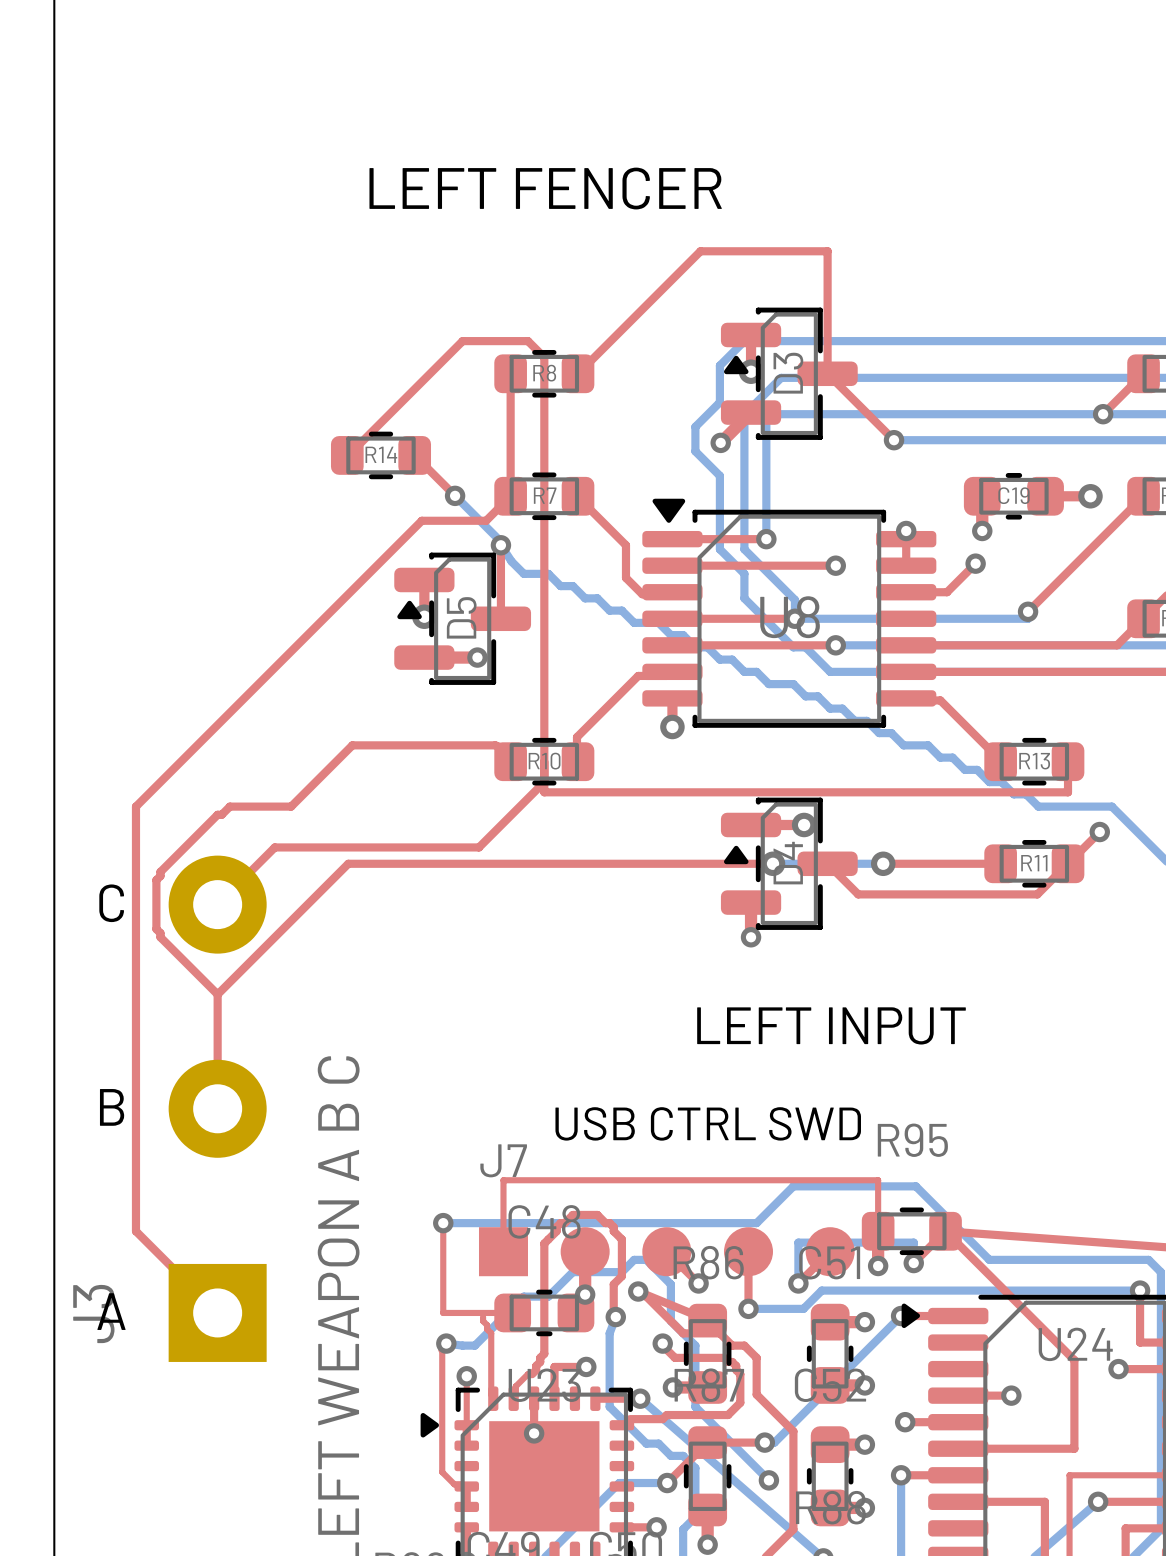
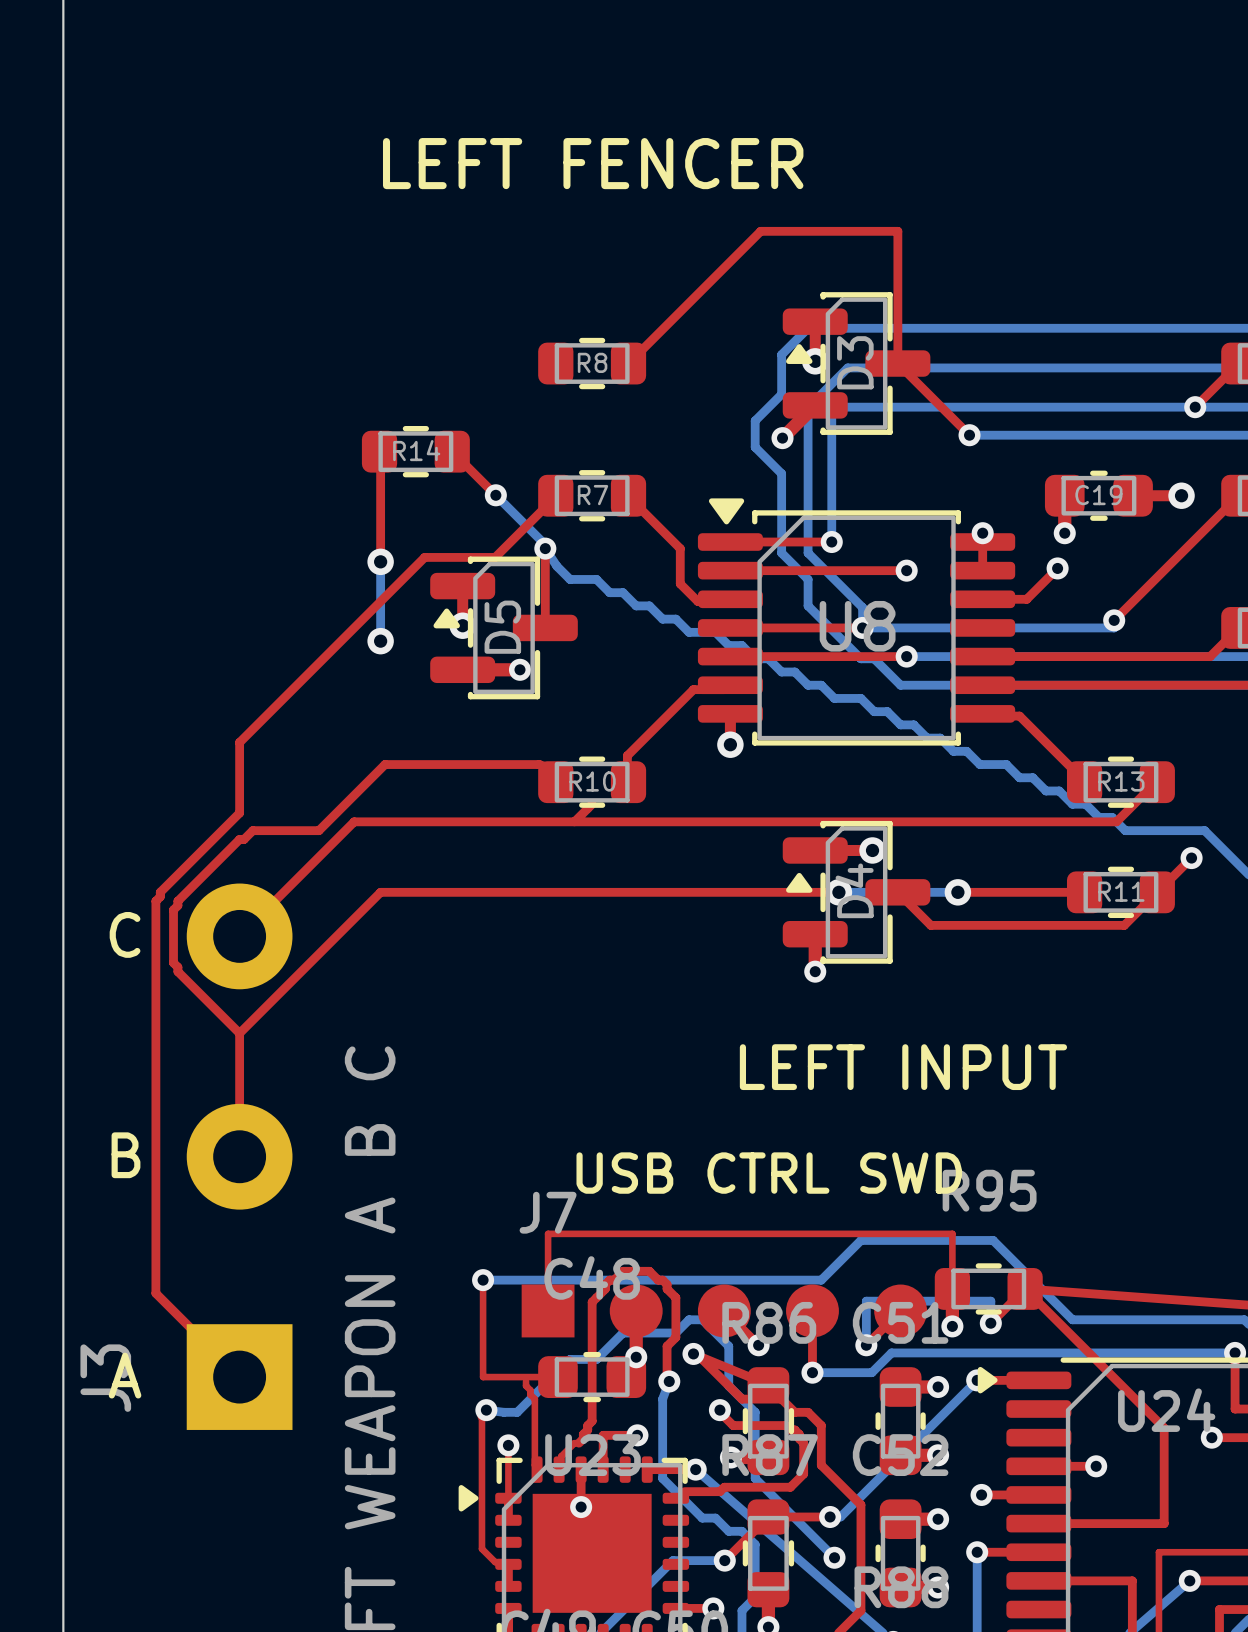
top track: (510, 373) (510, 496) (486, 520) (421, 520) (389, 553) -> (556, 495) (495, 557) (424, 557)
top track: (347, 455) (462, 341) (527, 341) (544, 357) (544, 792) (1068, 792) (1068, 761) -> (301, 874) (354, 821) (1116, 821) (1157, 782)
top track: none -> (379, 451) (380, 561)
bottom track: none -> (380, 561) (380, 641)
via: none -> (380, 561)
via: none -> (380, 641)
top track: (217, 724) (135, 806) (135, 1231) (140, 1235) -> (239, 742) (239, 813) (160, 892) (160, 896) (155, 901) (155, 1293)
top track: (527, 798) (478, 847) (274, 847) -> none

